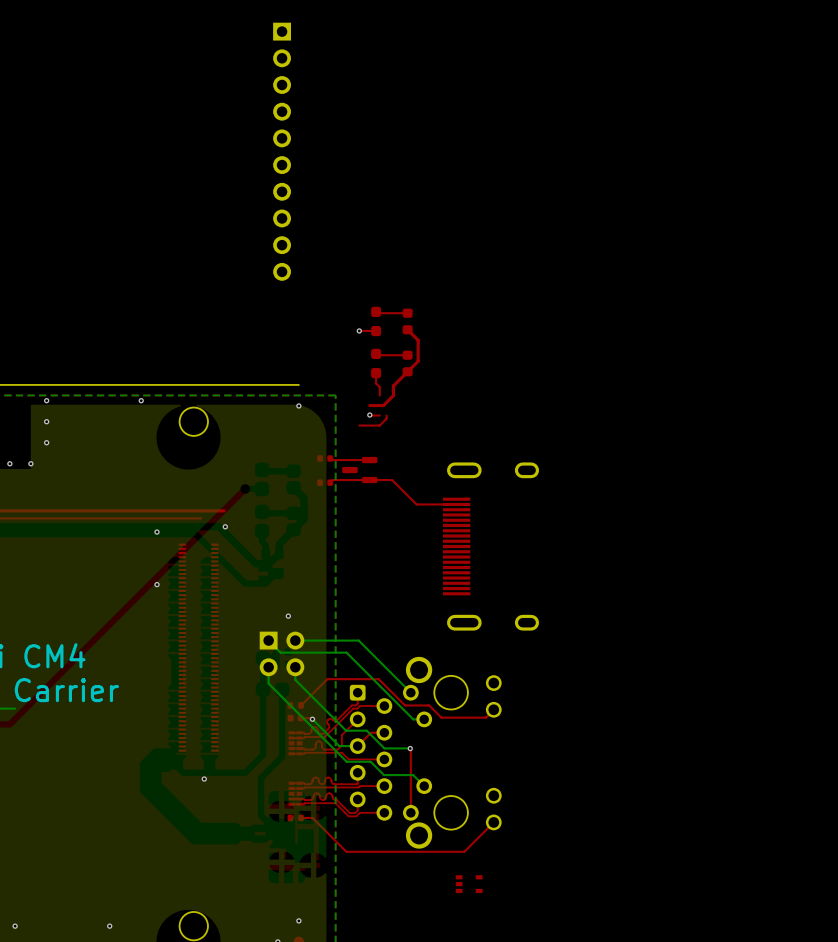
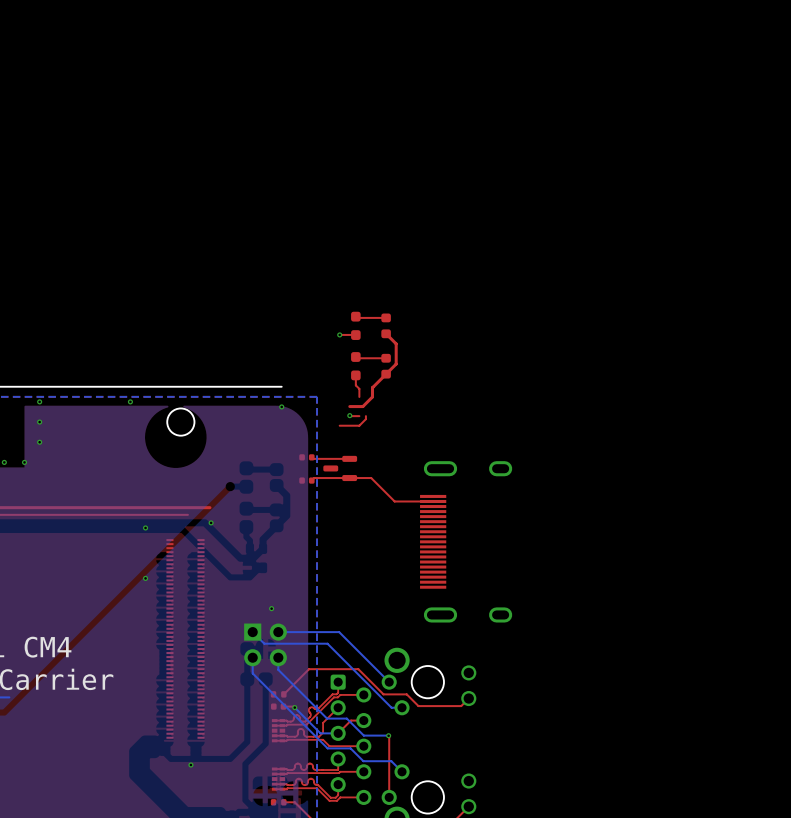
part: (282, 151) -> none

